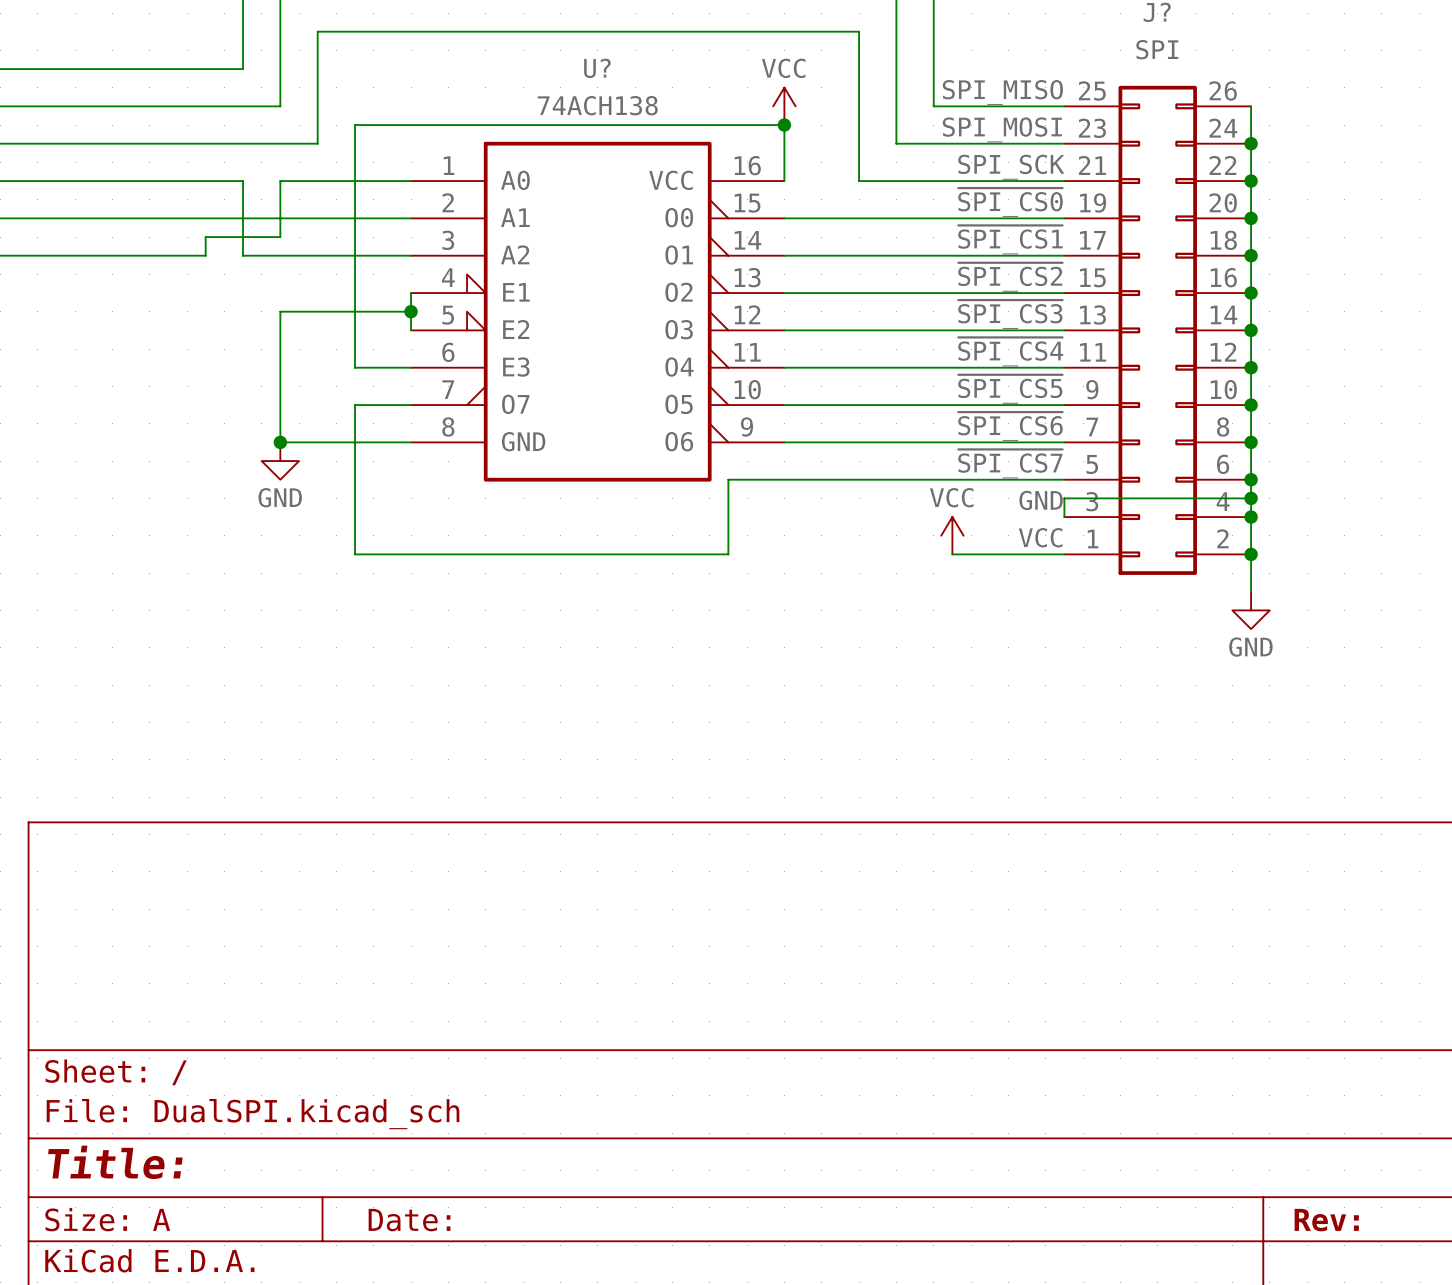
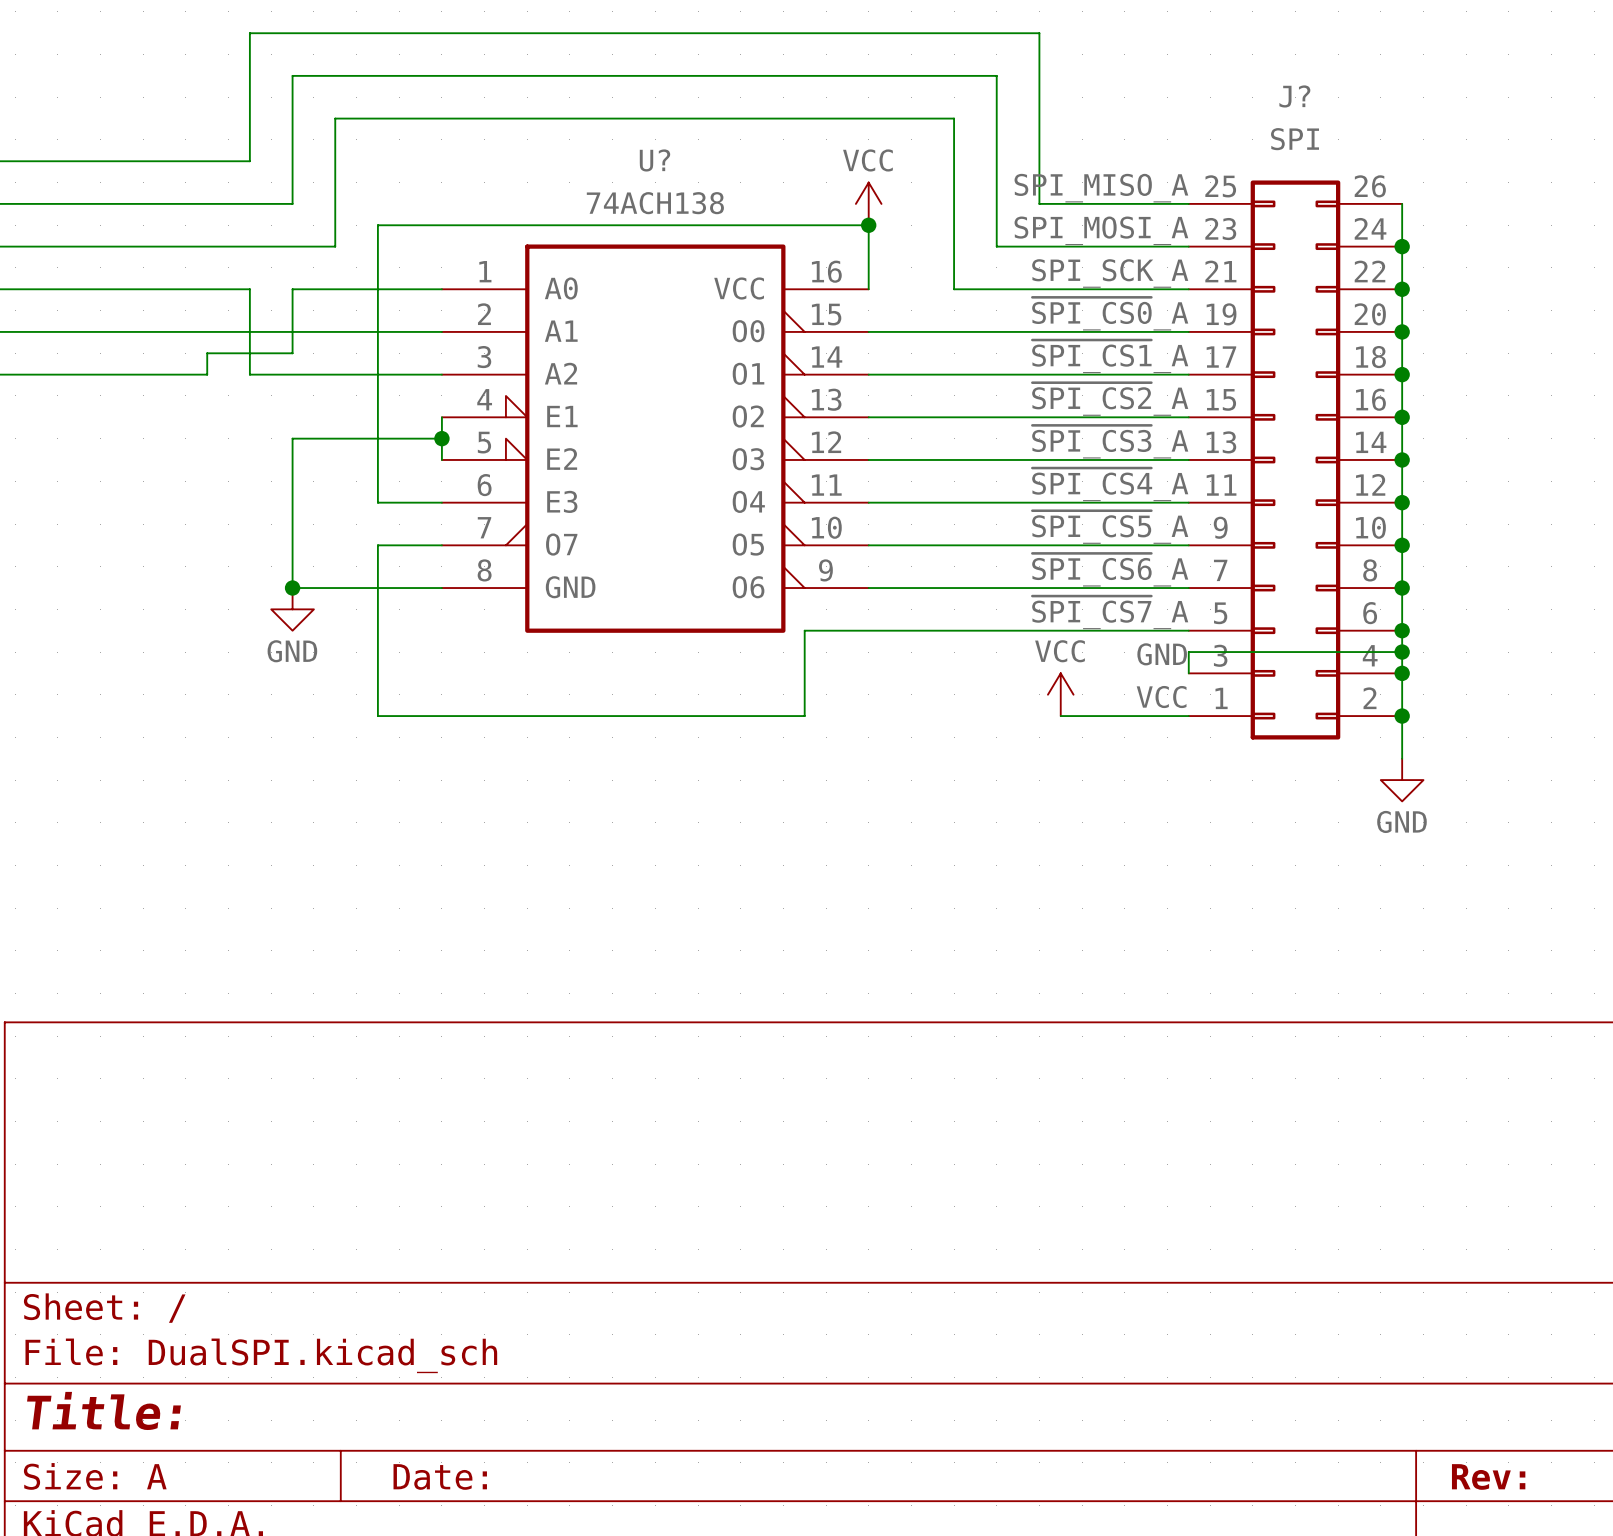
label: SPI_MISO (1002, 92) -> SPI_MISO_A (1101, 188)
label: SPI_MOSI (1002, 129) -> SPI_MOSI_A (1101, 230)
label: SPI_SCK (1011, 167) -> SPI_SCK_A (1110, 273)
label: ~{SPI_CS0} (1010, 202) -> ~{SPI_CS0}_A (1110, 313)
label: ~{SPI_CS1} (1010, 239) -> ~{SPI_CS1}_A (1110, 356)
label: ~{SPI_CS2} (1010, 277) -> ~{SPI_CS2}_A (1110, 399)
label: ~{SPI_CS3} (1010, 314) -> ~{SPI_CS3}_A (1110, 441)
label: ~{SPI_CS4} (1010, 351) -> ~{SPI_CS4}_A (1110, 484)
label: ~{SPI_CS5} (1010, 389) -> ~{SPI_CS5}_A (1110, 527)
label: ~{SPI_CS6} (1010, 426) -> ~{SPI_CS6}_A (1110, 569)
label: ~{SPI_CS7} (1010, 463) -> ~{SPI_CS7}_A (1110, 612)

